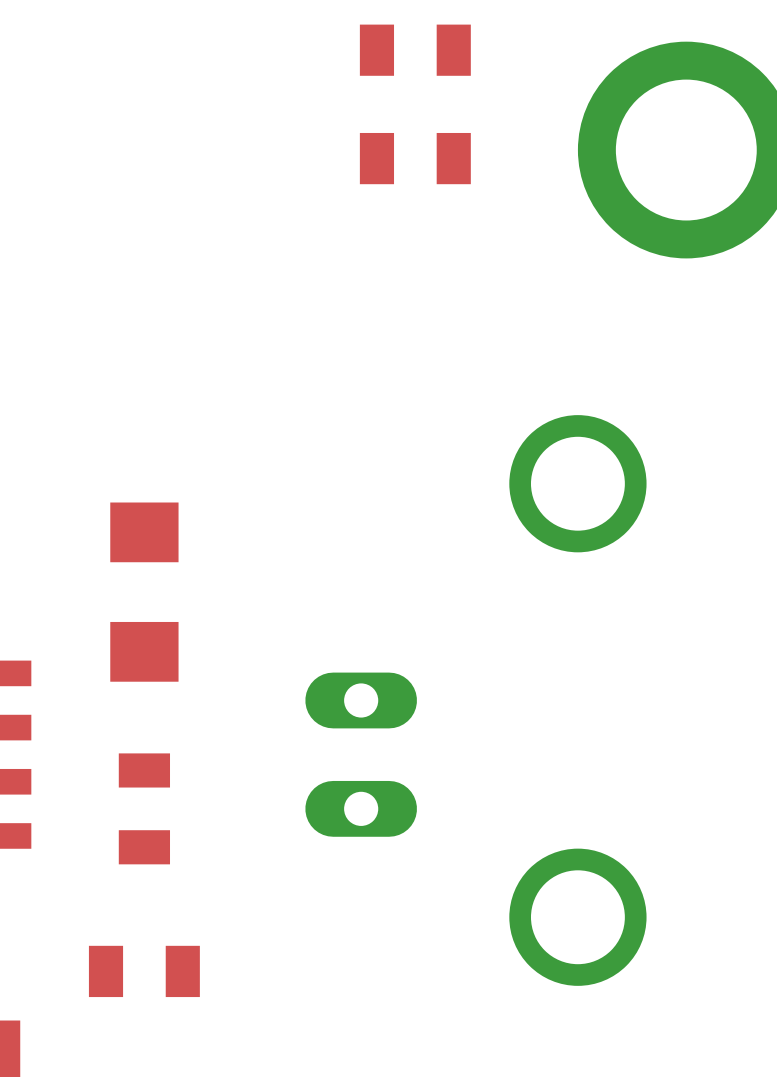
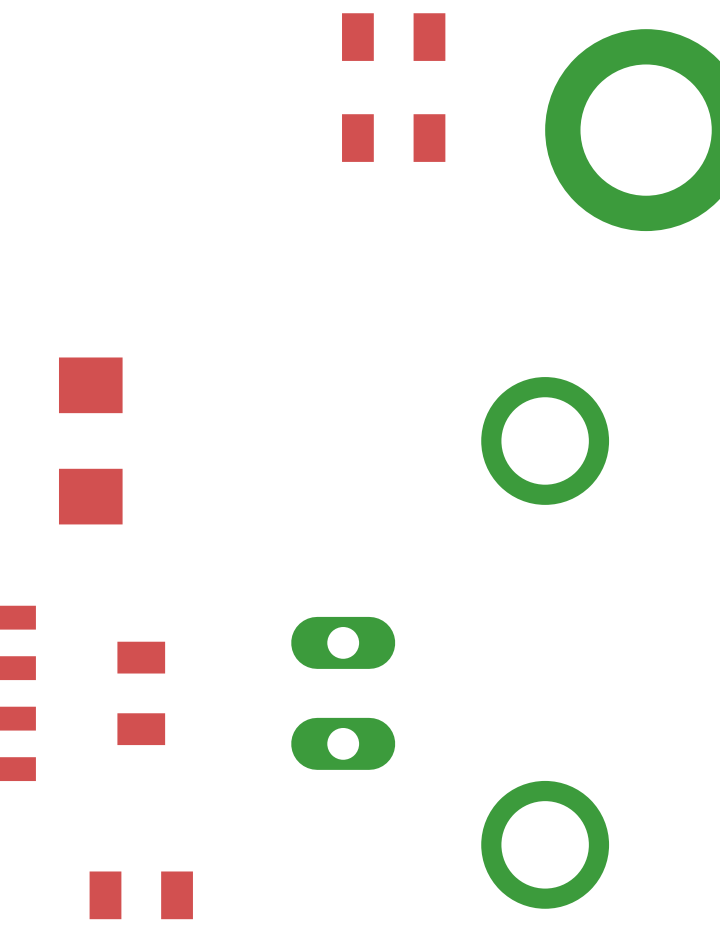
part position: (144, 592) -> (90, 440)
part position: (144, 808) -> (141, 693)

